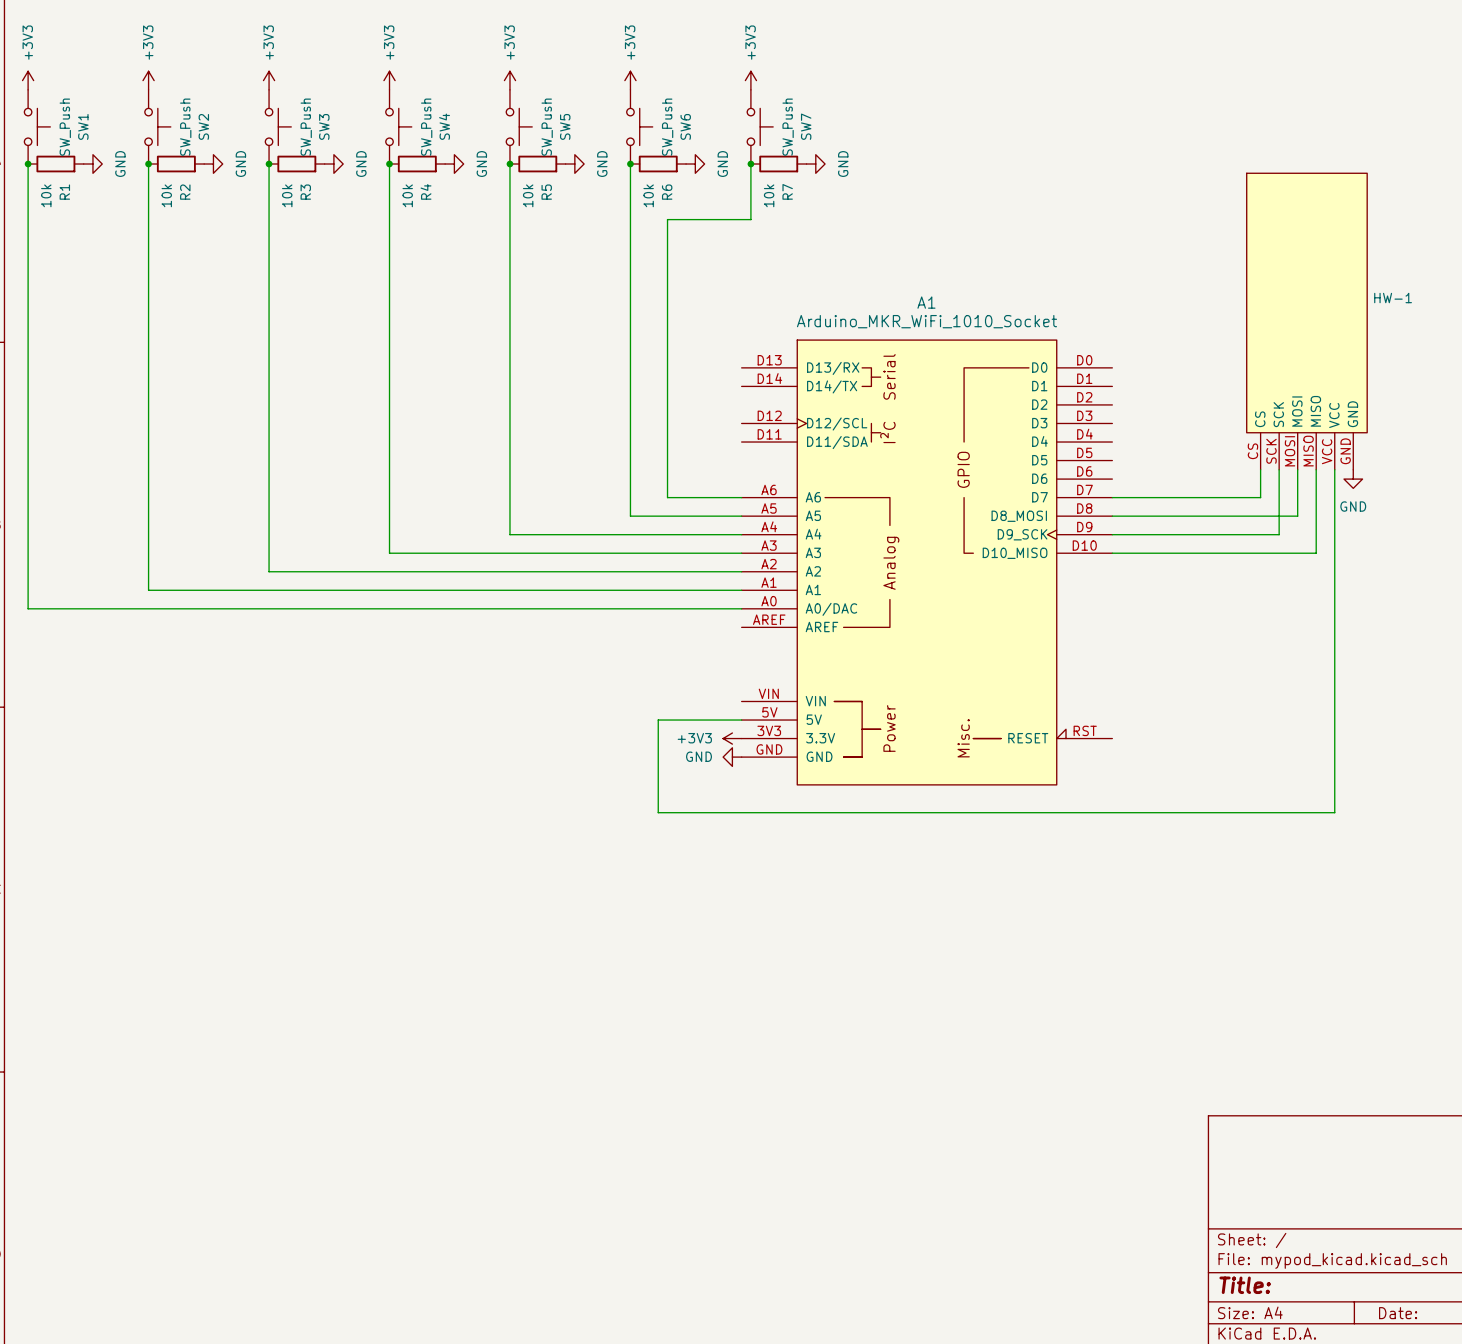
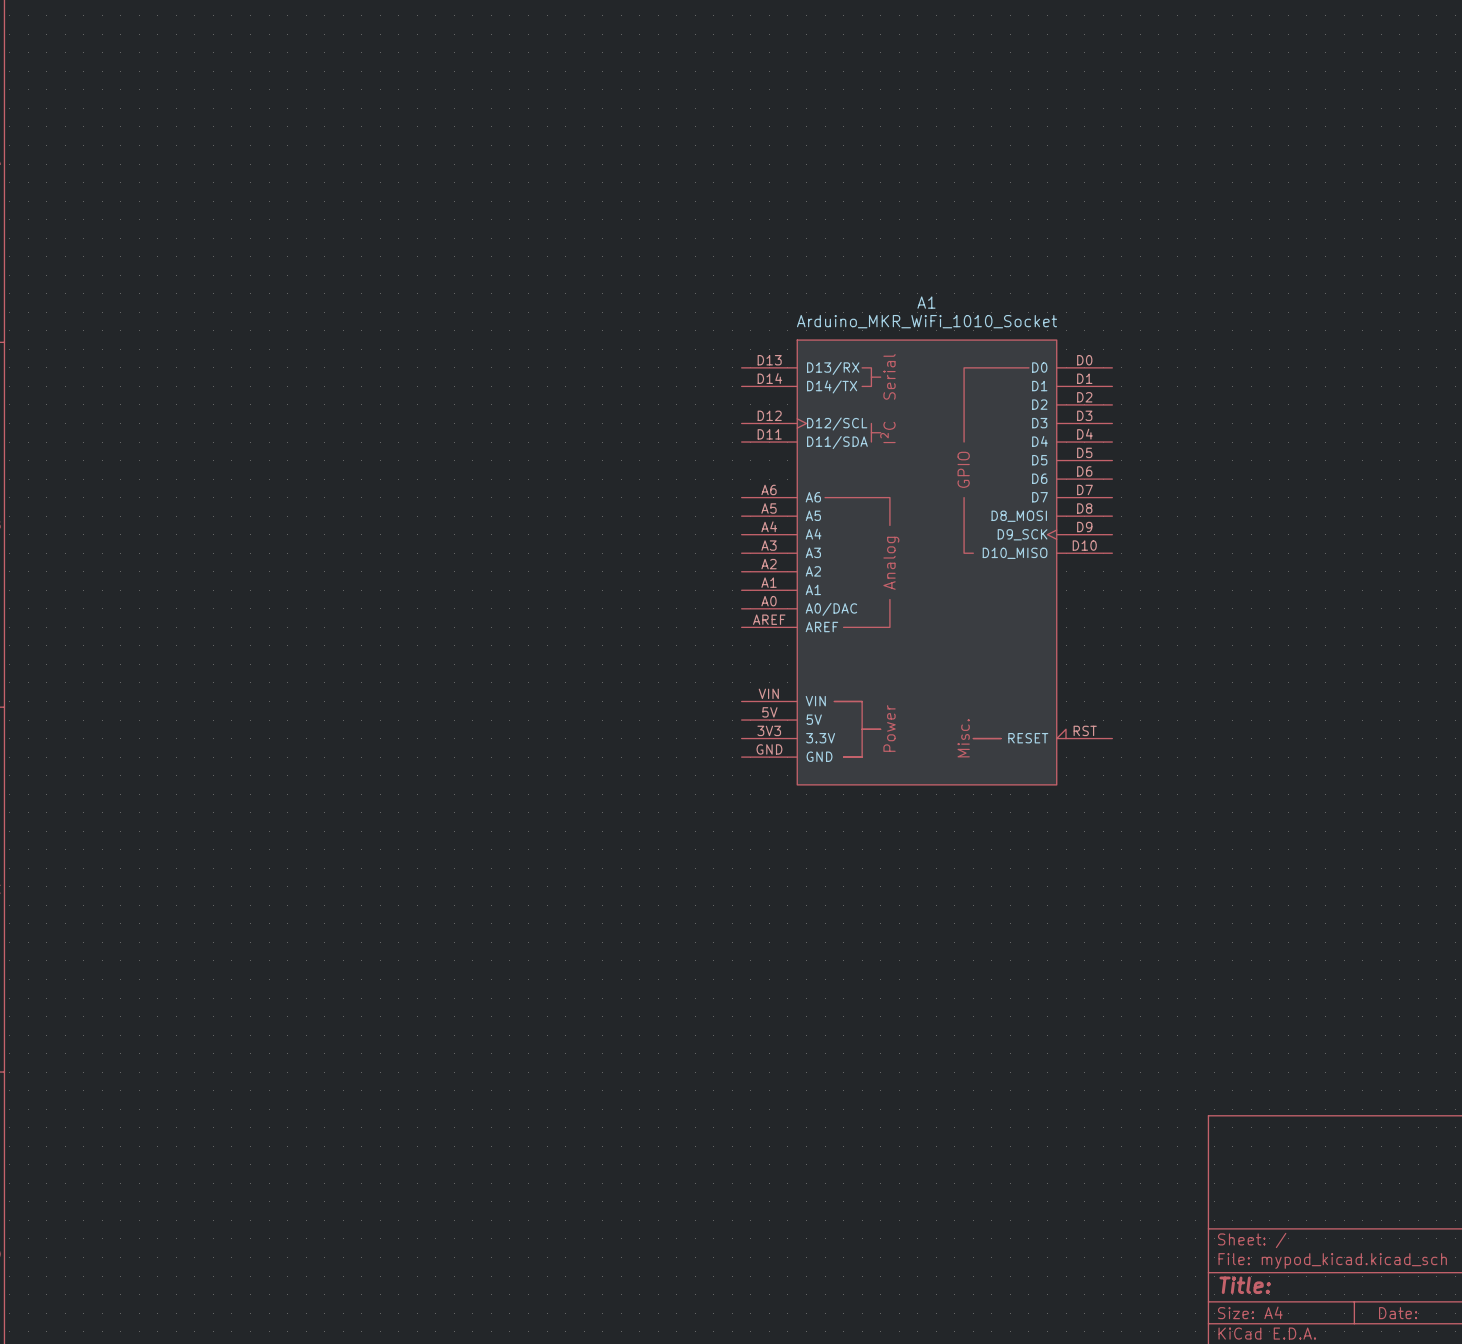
power symbol: +3V3 (28, 80) -> none
power symbol: +3V3 (148, 80) -> none
power symbol: +3V3 (269, 80) -> none
power symbol: +3V3 (389, 80) -> none
power symbol: +3V3 (509, 80) -> none
power symbol: +3V3 (630, 80) -> none
power symbol: +3V3 (750, 80) -> none
SW1: SW_Push (37, 126) -> none
SW2: SW_Push (157, 126) -> none
SW3: SW_Push (278, 126) -> none
SW4: SW_Push (398, 126) -> none
SW5: SW_Push (519, 126) -> none
SW6: SW_Push (639, 126) -> none
SW7: SW_Push (760, 126) -> none
wire: (28, 164) (28, 608) (741, 608) -> none
junction: (28, 164) -> none
R1: 10k (55, 164) -> none
power symbol: GND (92, 164) -> none
wire: (148, 164) (148, 590) (741, 590) -> none
junction: (148, 164) -> none
R2: 10k (176, 164) -> none
power symbol: GND (213, 164) -> none
wire: (269, 164) (269, 571) (741, 571) -> none
junction: (269, 164) -> none
R3: 10k (296, 164) -> none
power symbol: GND (333, 164) -> none
wire: (389, 164) (389, 553) (741, 553) -> none
junction: (389, 164) -> none
R4: 10k (417, 164) -> none
power symbol: GND (454, 164) -> none
wire: (509, 164) (509, 534) (741, 534) -> none
junction: (509, 164) -> none
R5: 10k (537, 164) -> none
power symbol: GND (574, 164) -> none
wire: (630, 164) (630, 516) (741, 516) -> none
junction: (630, 164) -> none
R6: 10k (658, 164) -> none
power symbol: GND (695, 164) -> none
wire: (750, 164) (750, 219) (667, 219) (667, 497) (741, 497) -> none
junction: (750, 164) -> none
R7: 10k (778, 164) -> none
power symbol: GND (815, 164) -> none
HW-1: (1306, 321) -> none
wire: (1260, 469) (1260, 497) (1112, 497) -> none
wire: (1279, 469) (1279, 534) (1112, 534) -> none
wire: (1297, 469) (1297, 516) (1112, 516) -> none
wire: (1316, 469) (1316, 553) (1112, 553) -> none
wire: (1334, 469) (1334, 812) (658, 812) (658, 720) (741, 720) -> none
power symbol: GND (1353, 479) -> none
power symbol: +3V3 (732, 738) -> none
power symbol: GND (732, 757) -> none

